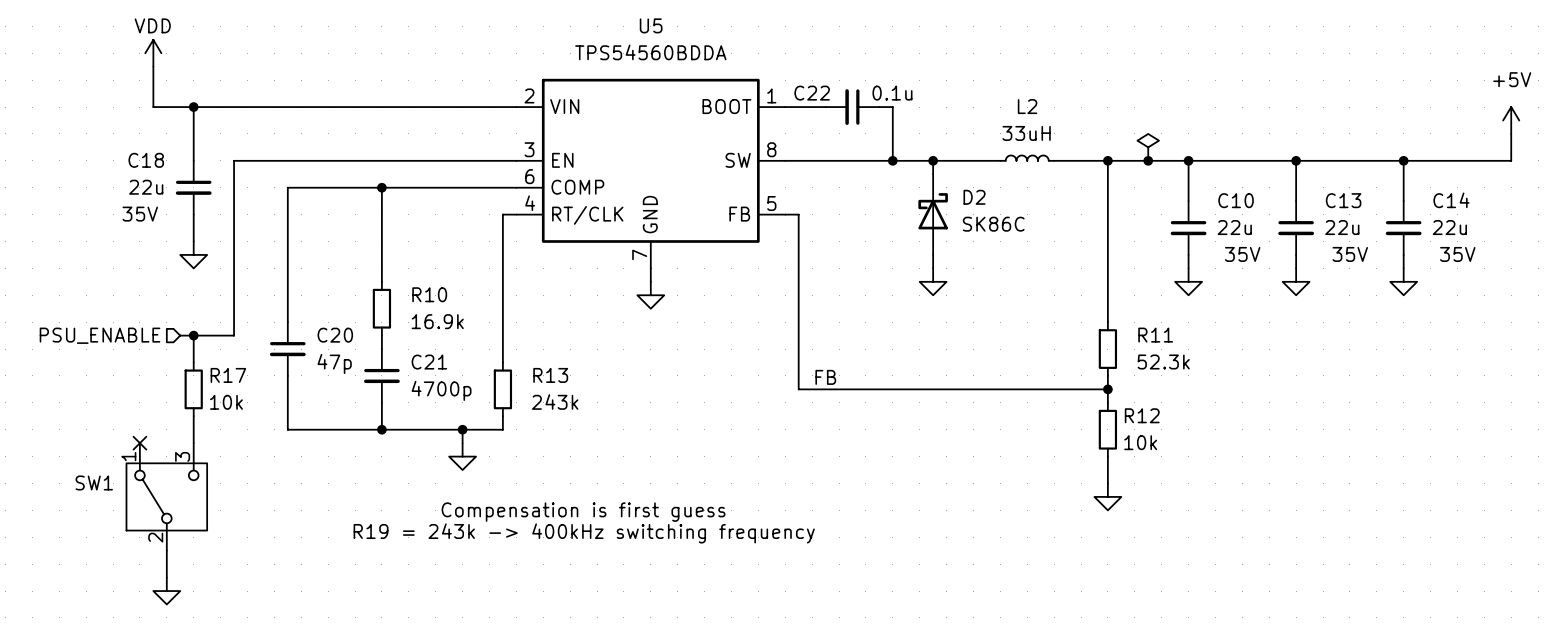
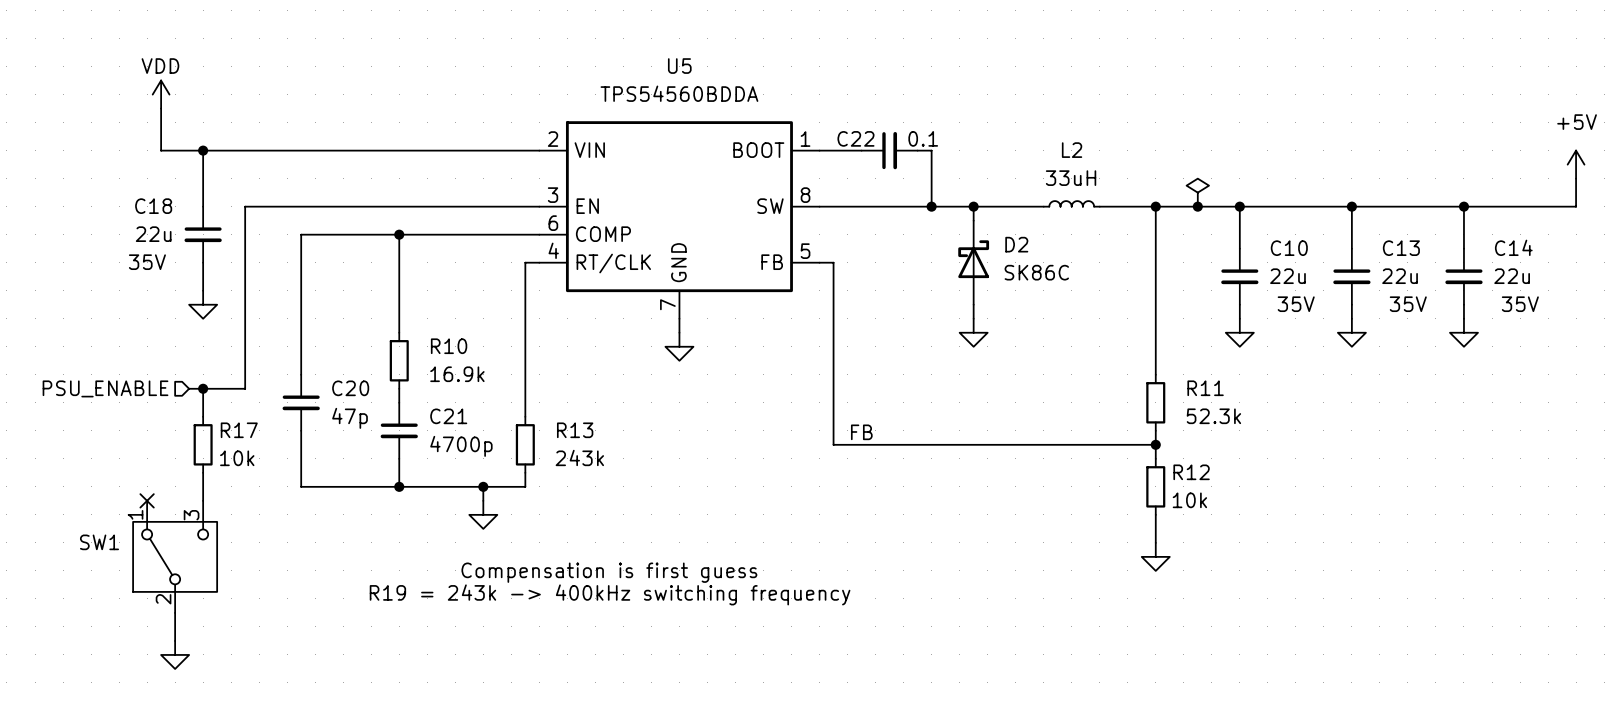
C22 value: 0.1u (892, 93) -> 0.1 (923, 138)
C22 rotation: 0° (852, 107) -> 180° (889, 150)

